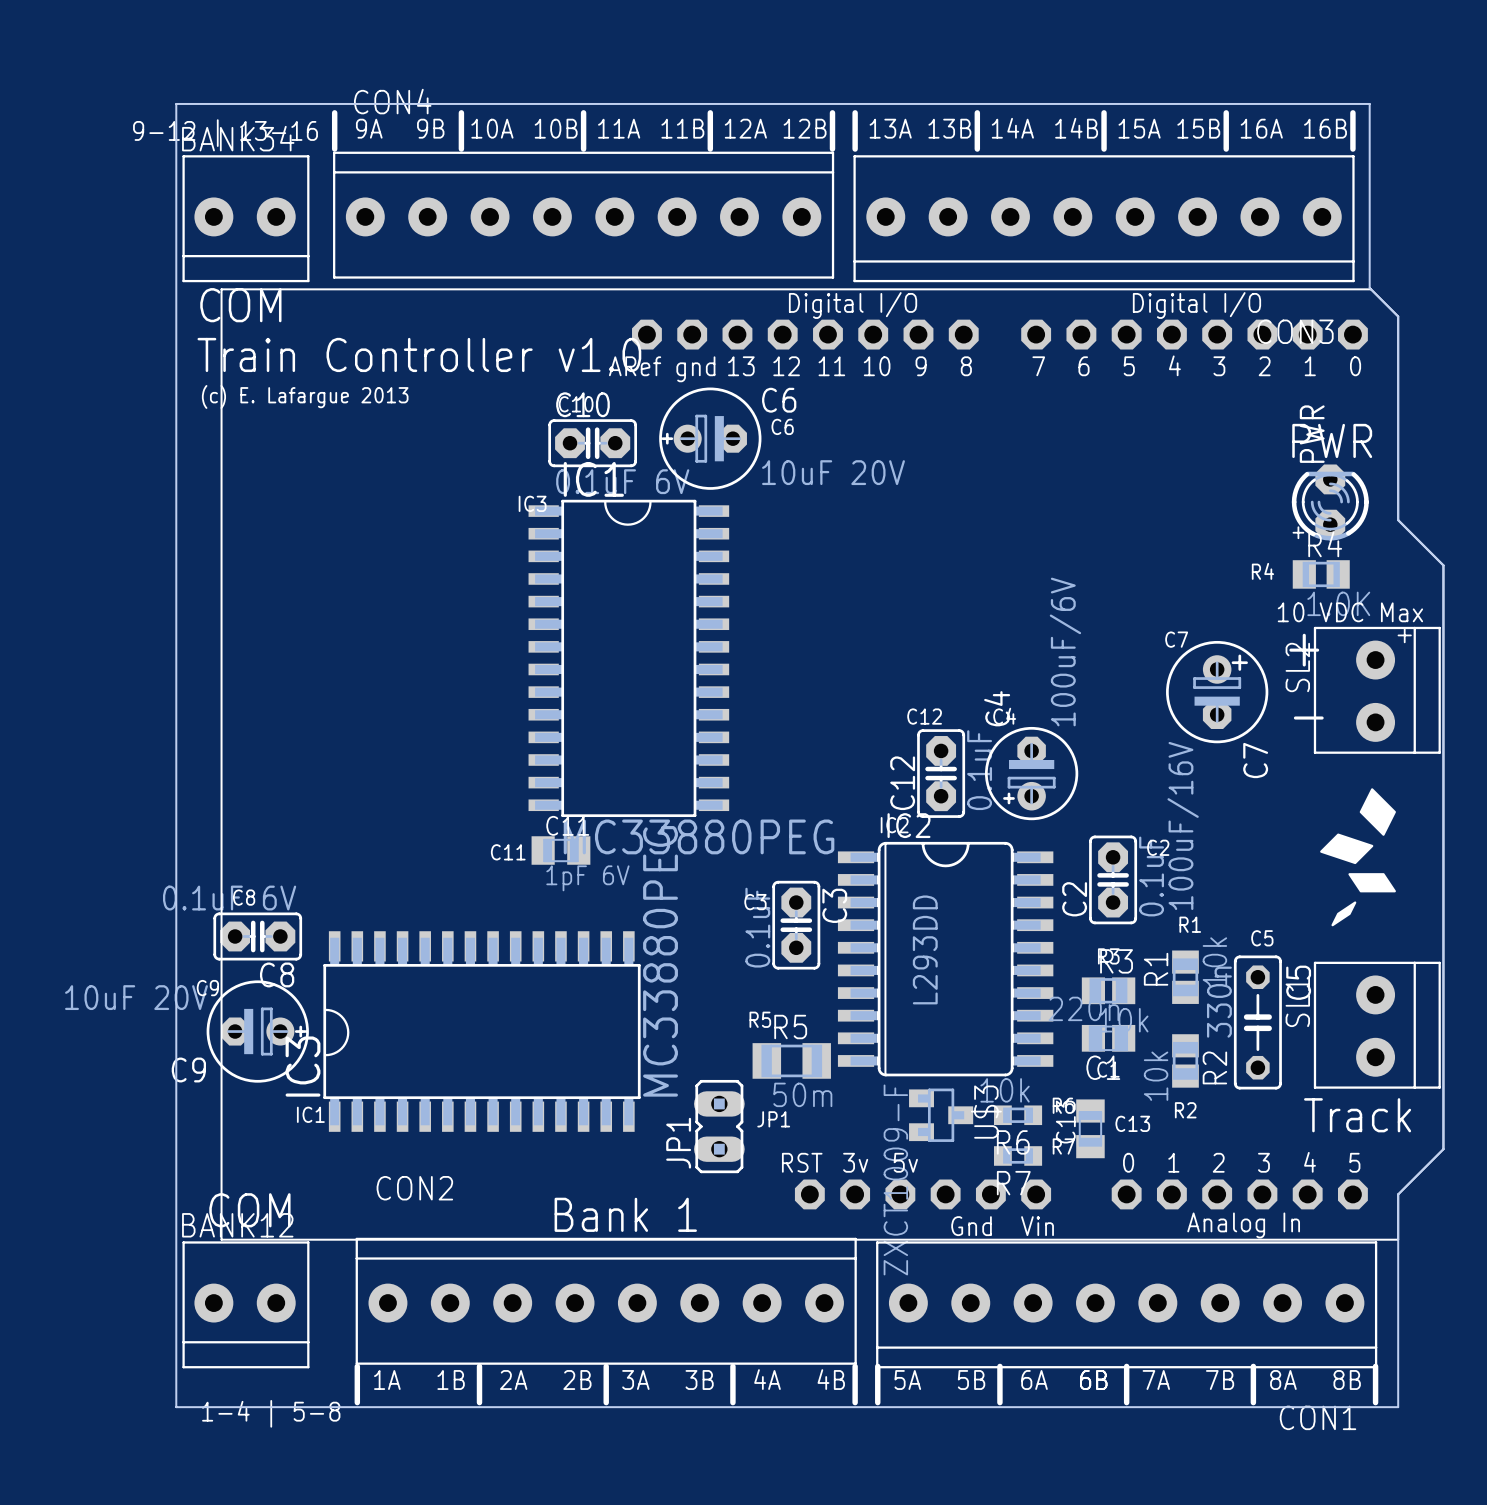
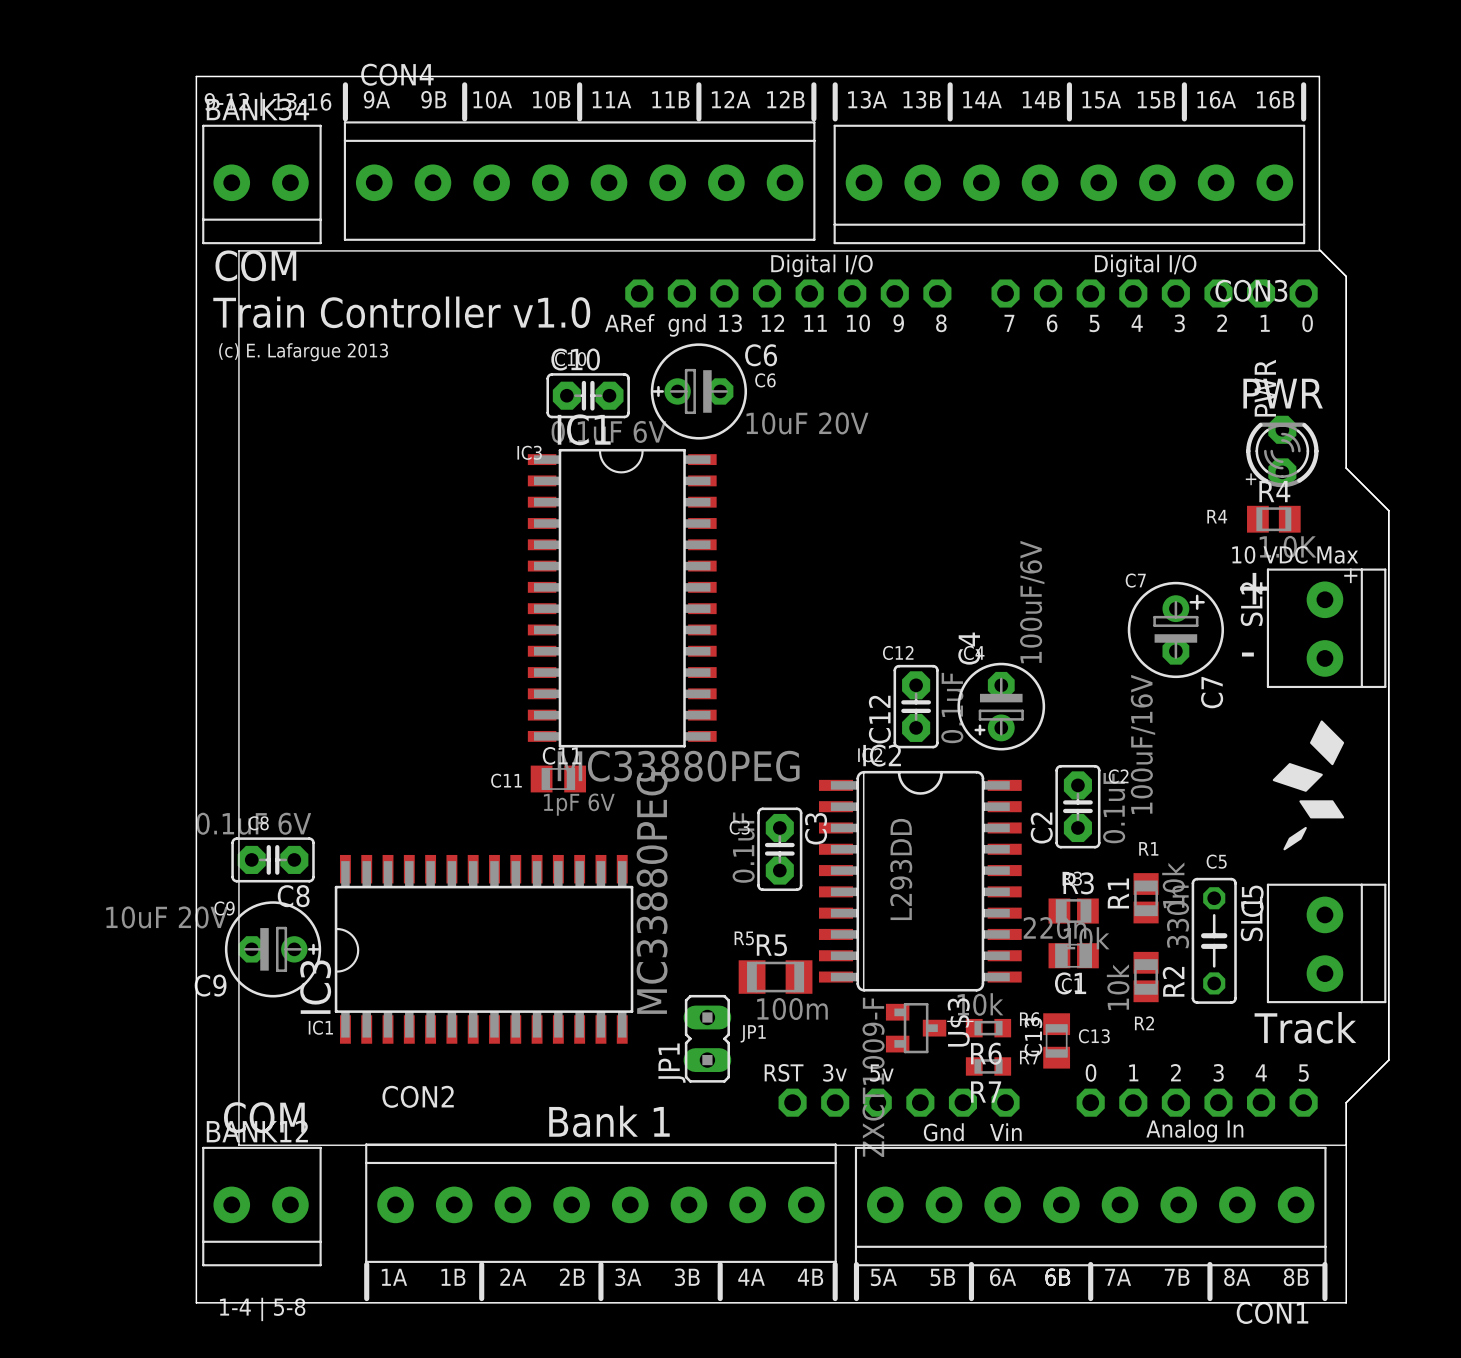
R5 value: 50m (802, 1094) -> 100m (792, 1009)

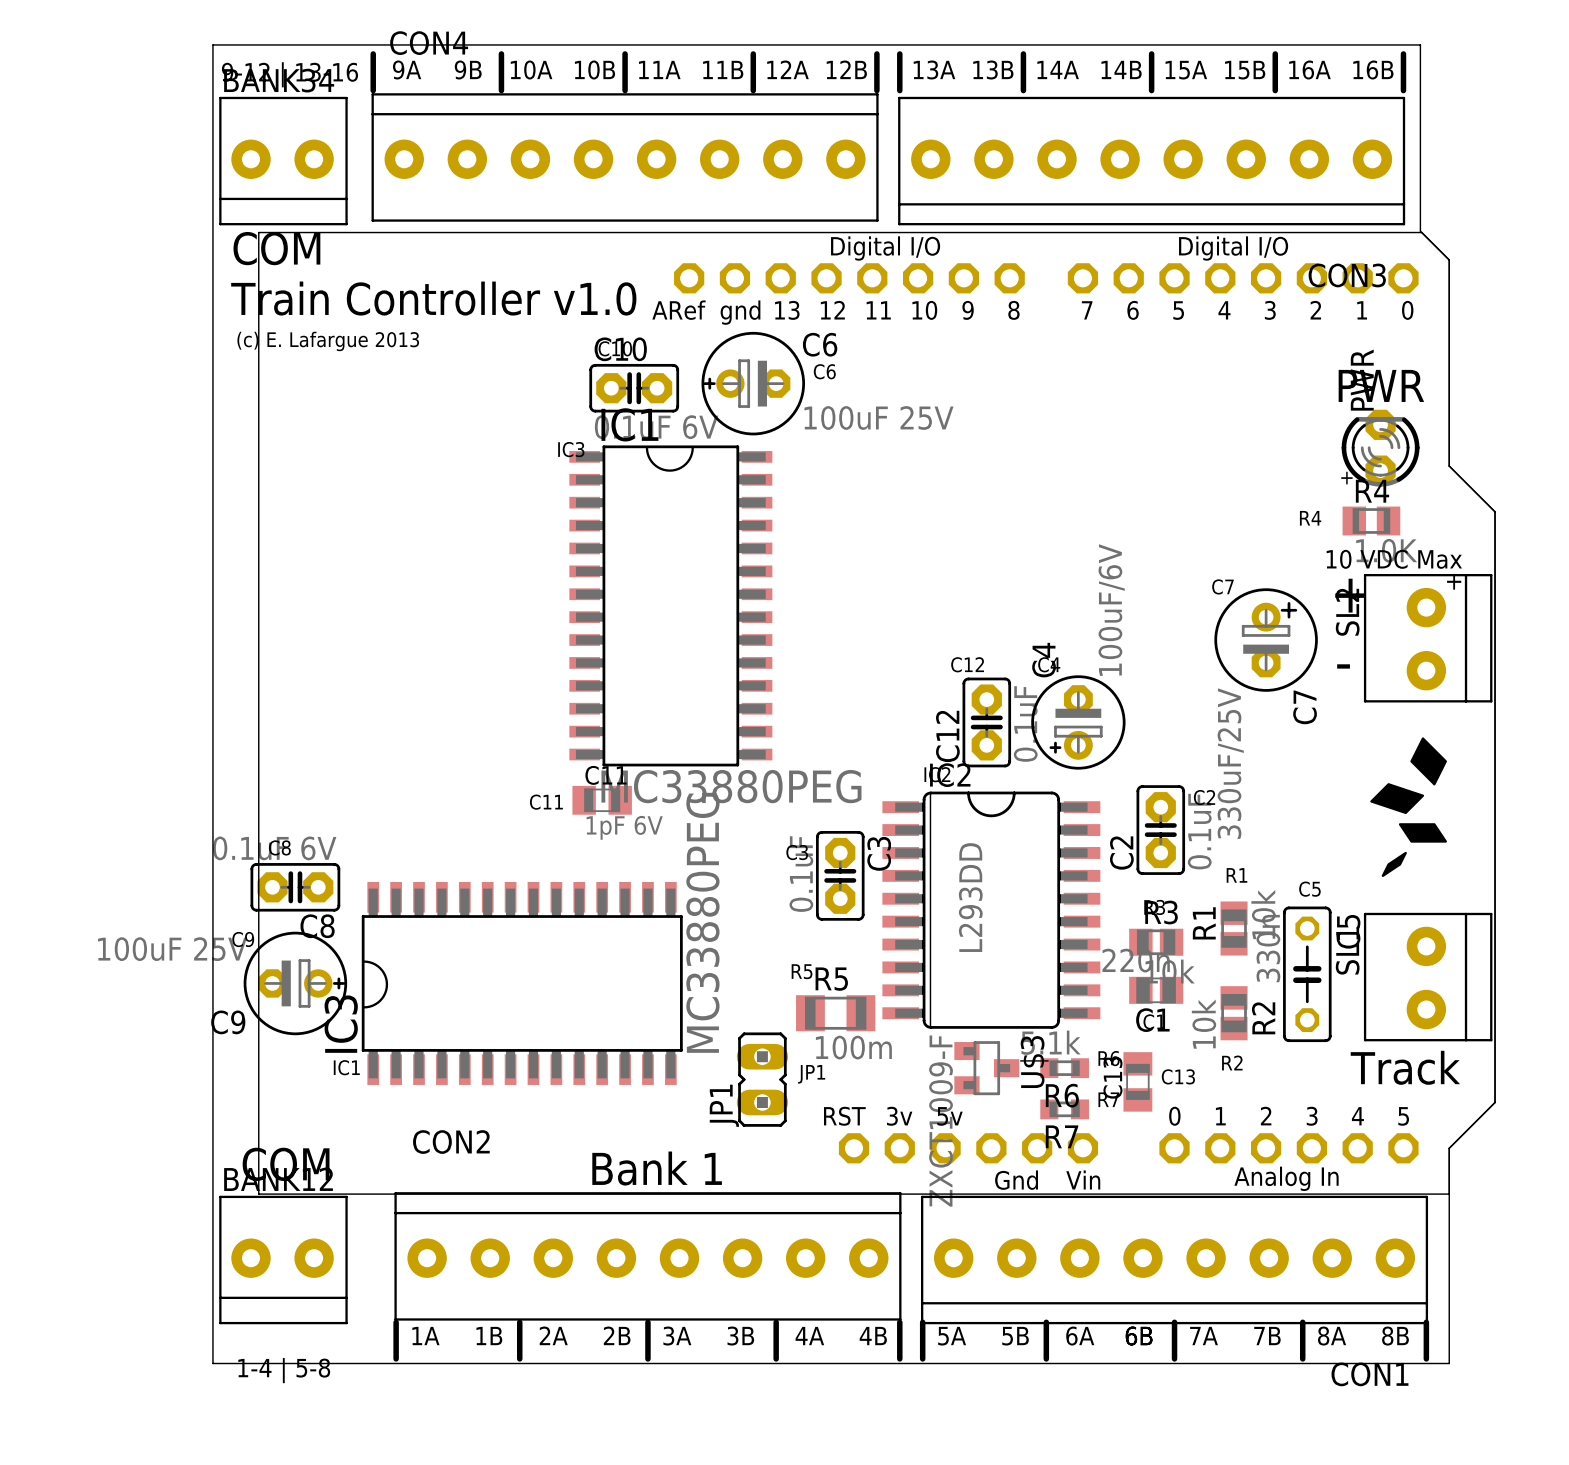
C6 value: 10uF 20V (807, 423) -> 100uF 25V (878, 417)
C7 value: 100uF/16V (1142, 744) -> 330uF/25V (1230, 763)
C9 value: 10uF 20V (167, 917) -> 100uF 25V (172, 949)
R6 value: 10k (980, 1004) -> 5.1k (1051, 1042)

